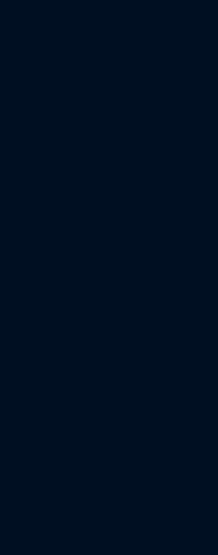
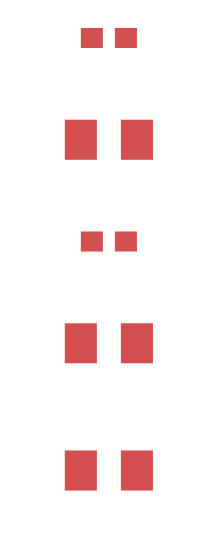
part: none -> (108, 37)
part: none -> (108, 139)
part: none -> (108, 241)
part: none -> (108, 343)
part: none -> (108, 470)

